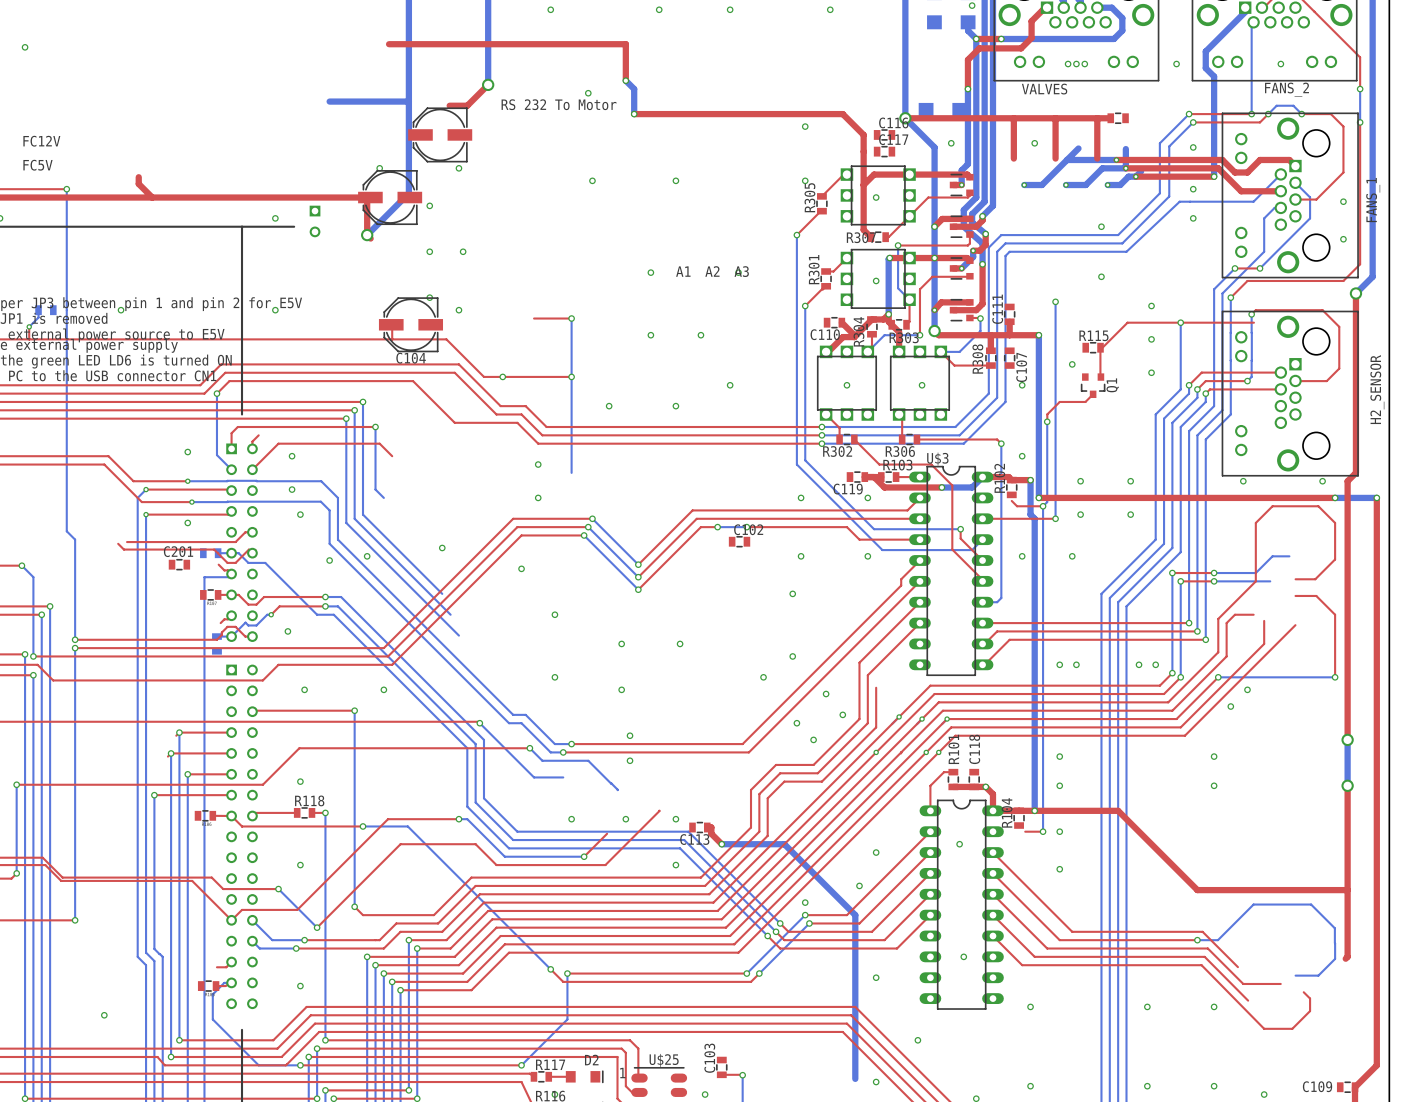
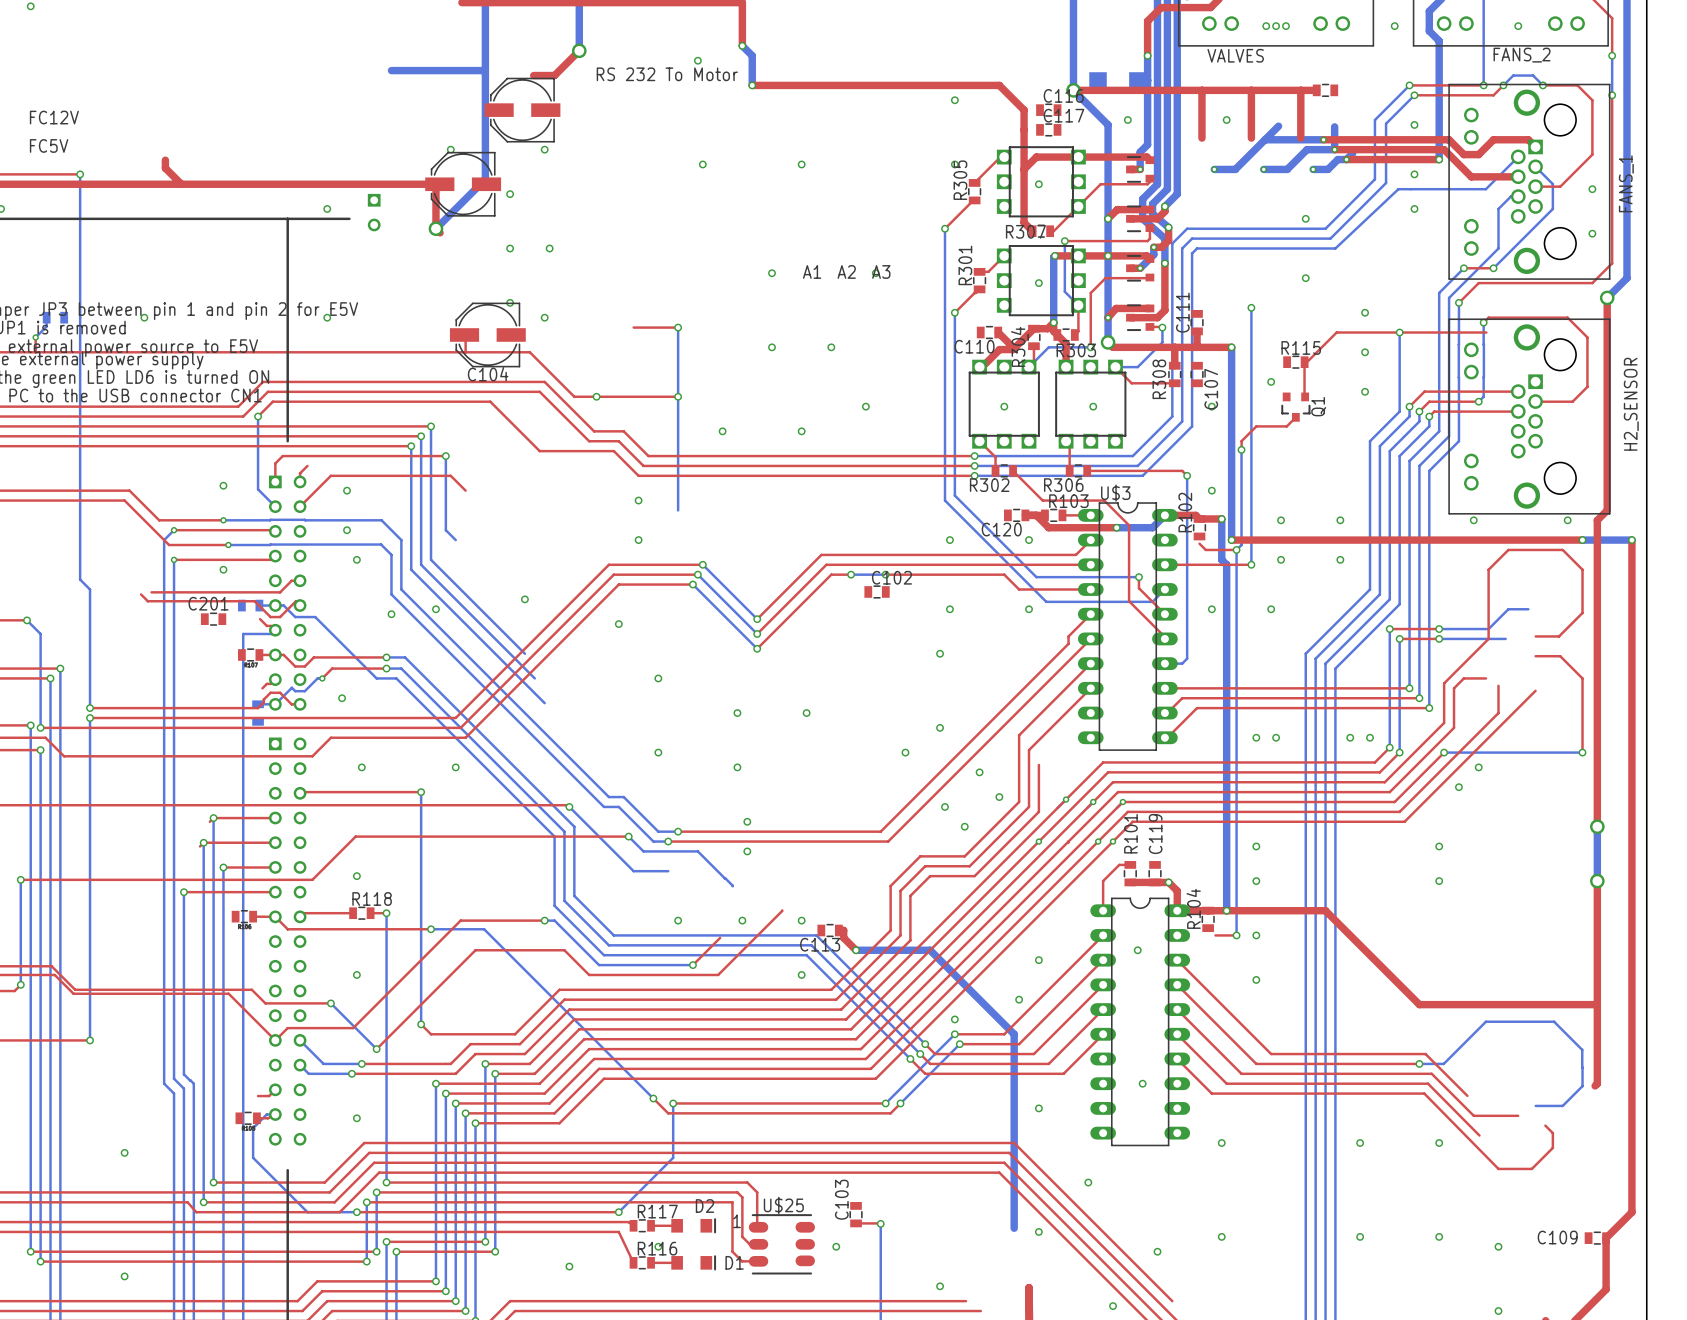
C119 name: C119 (848, 489) -> C120 (1001, 529)
C118 name: C118 (974, 749) -> C119 (1155, 834)

